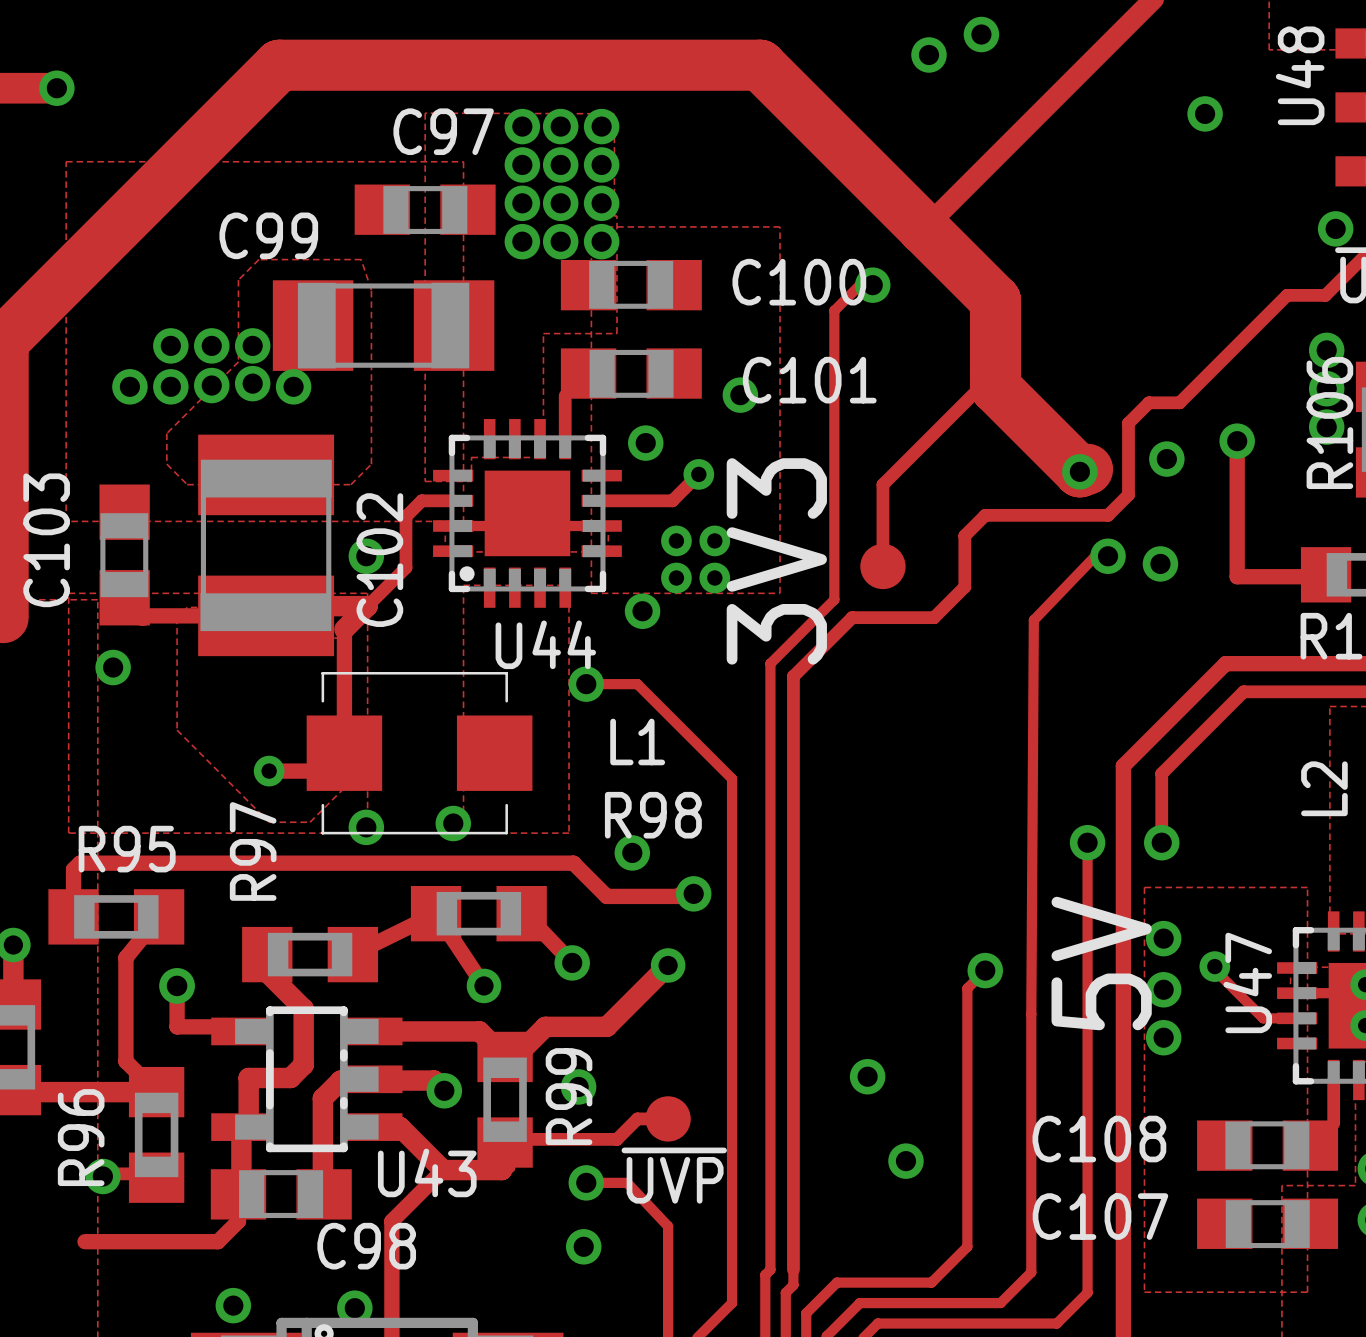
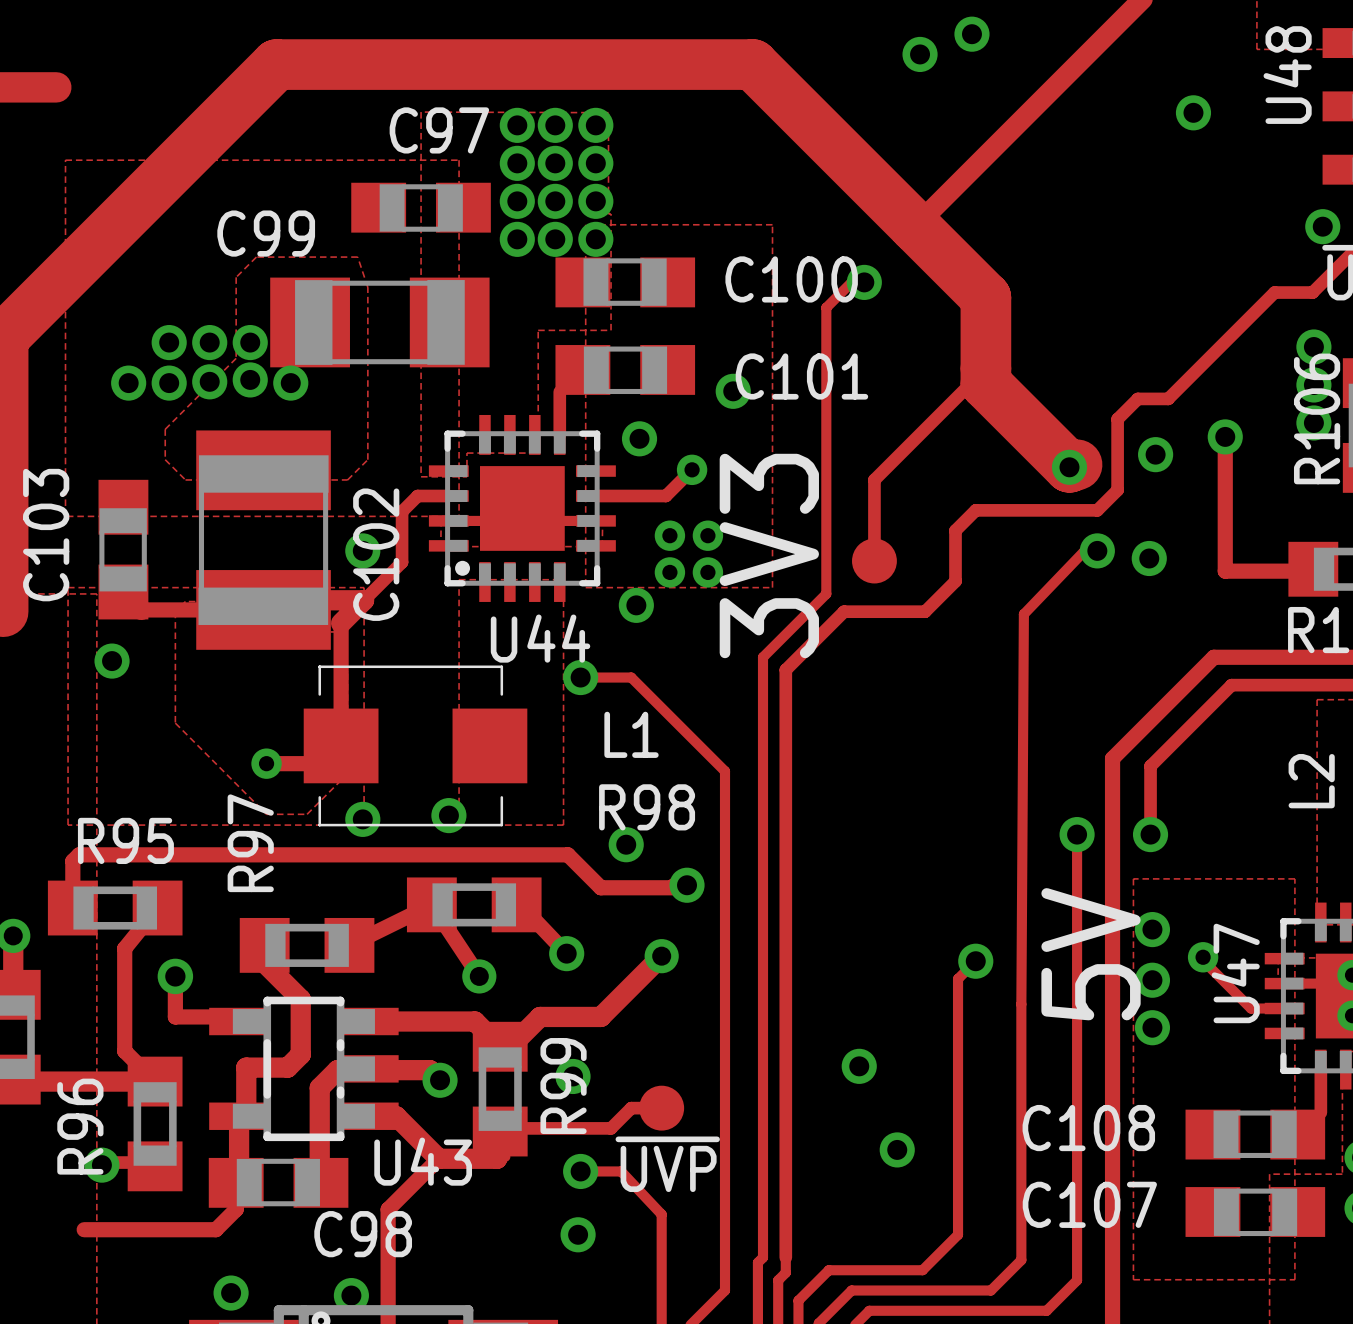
via: (56, 88) -> none

